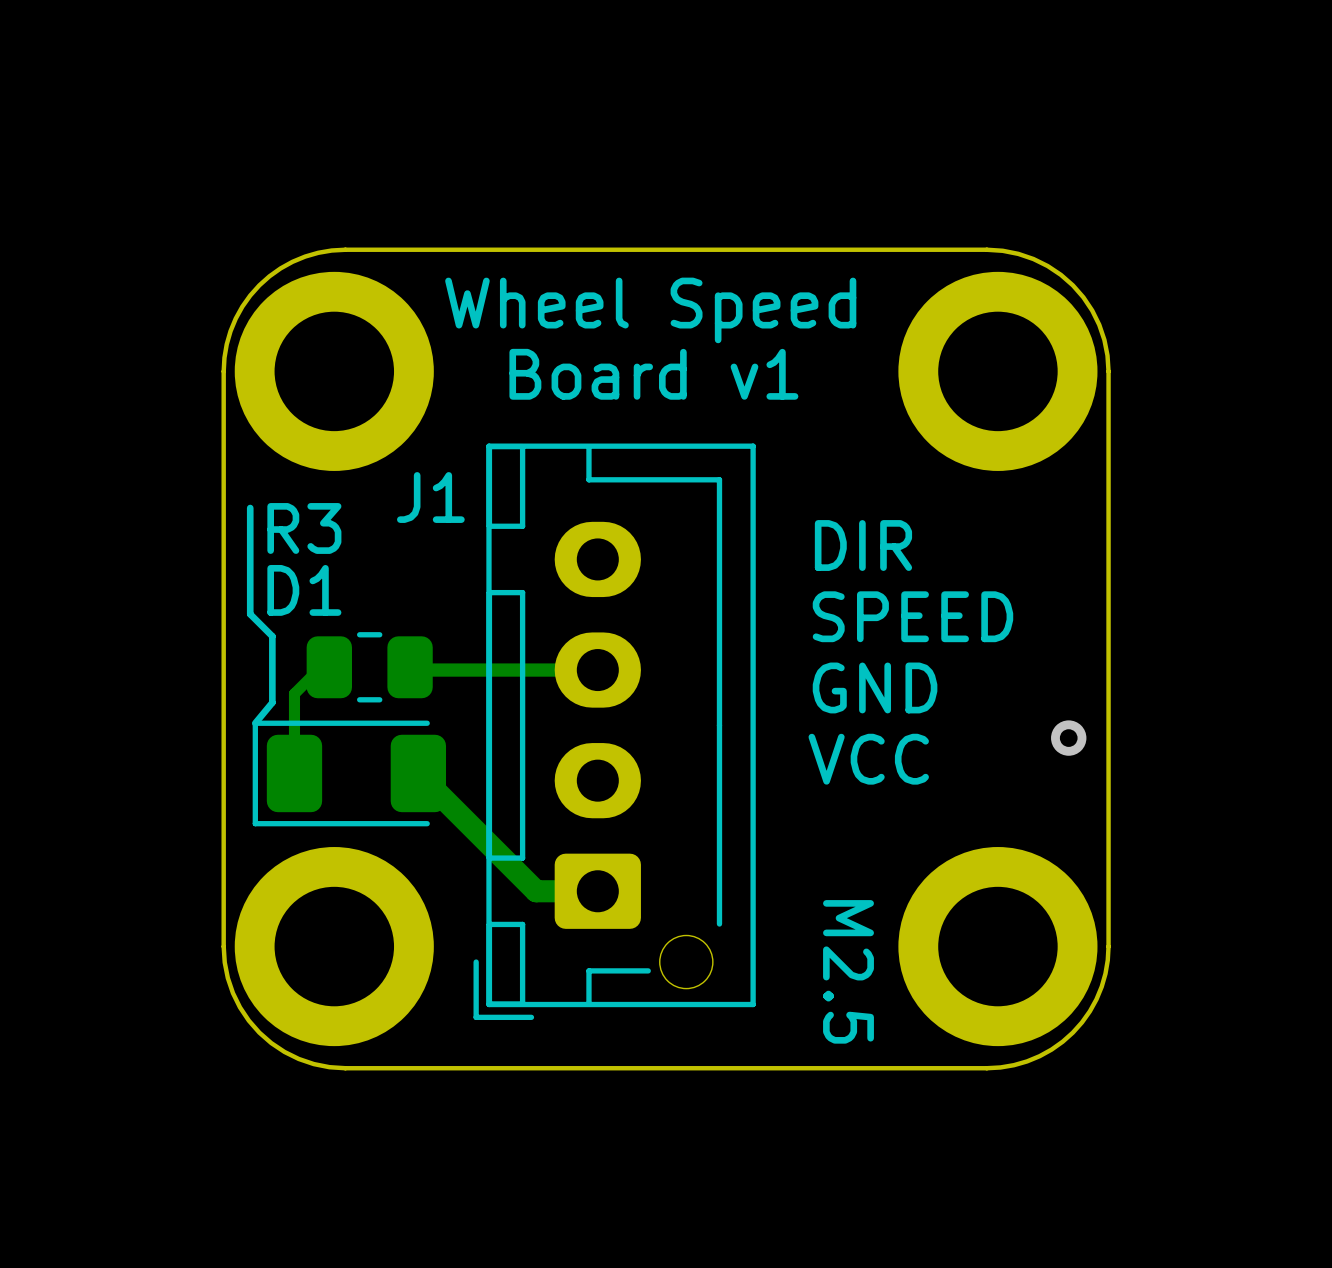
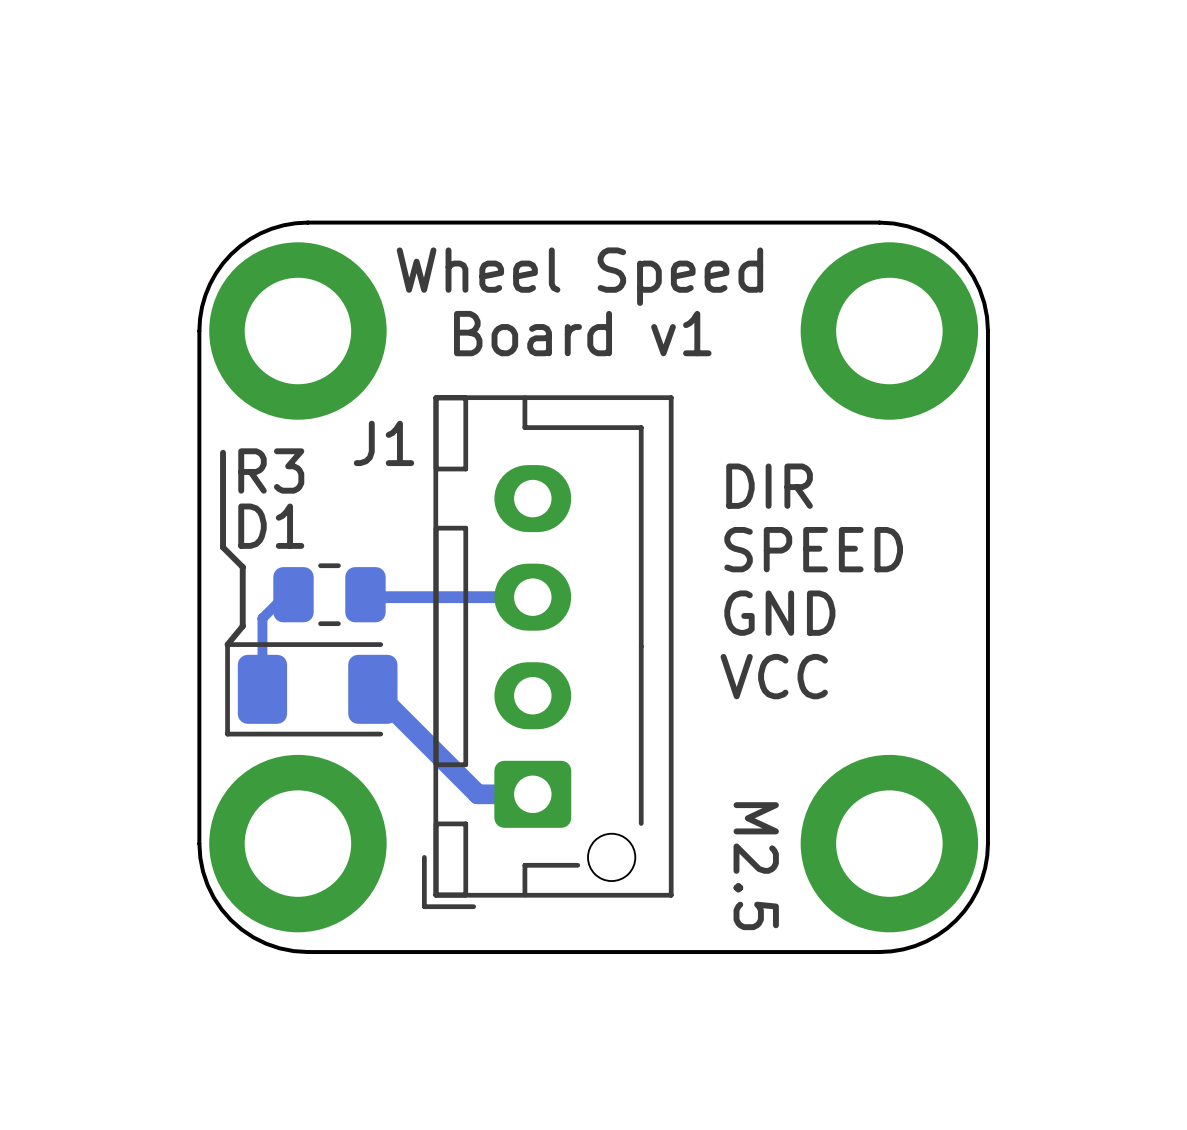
via: (1068, 738) -> none

